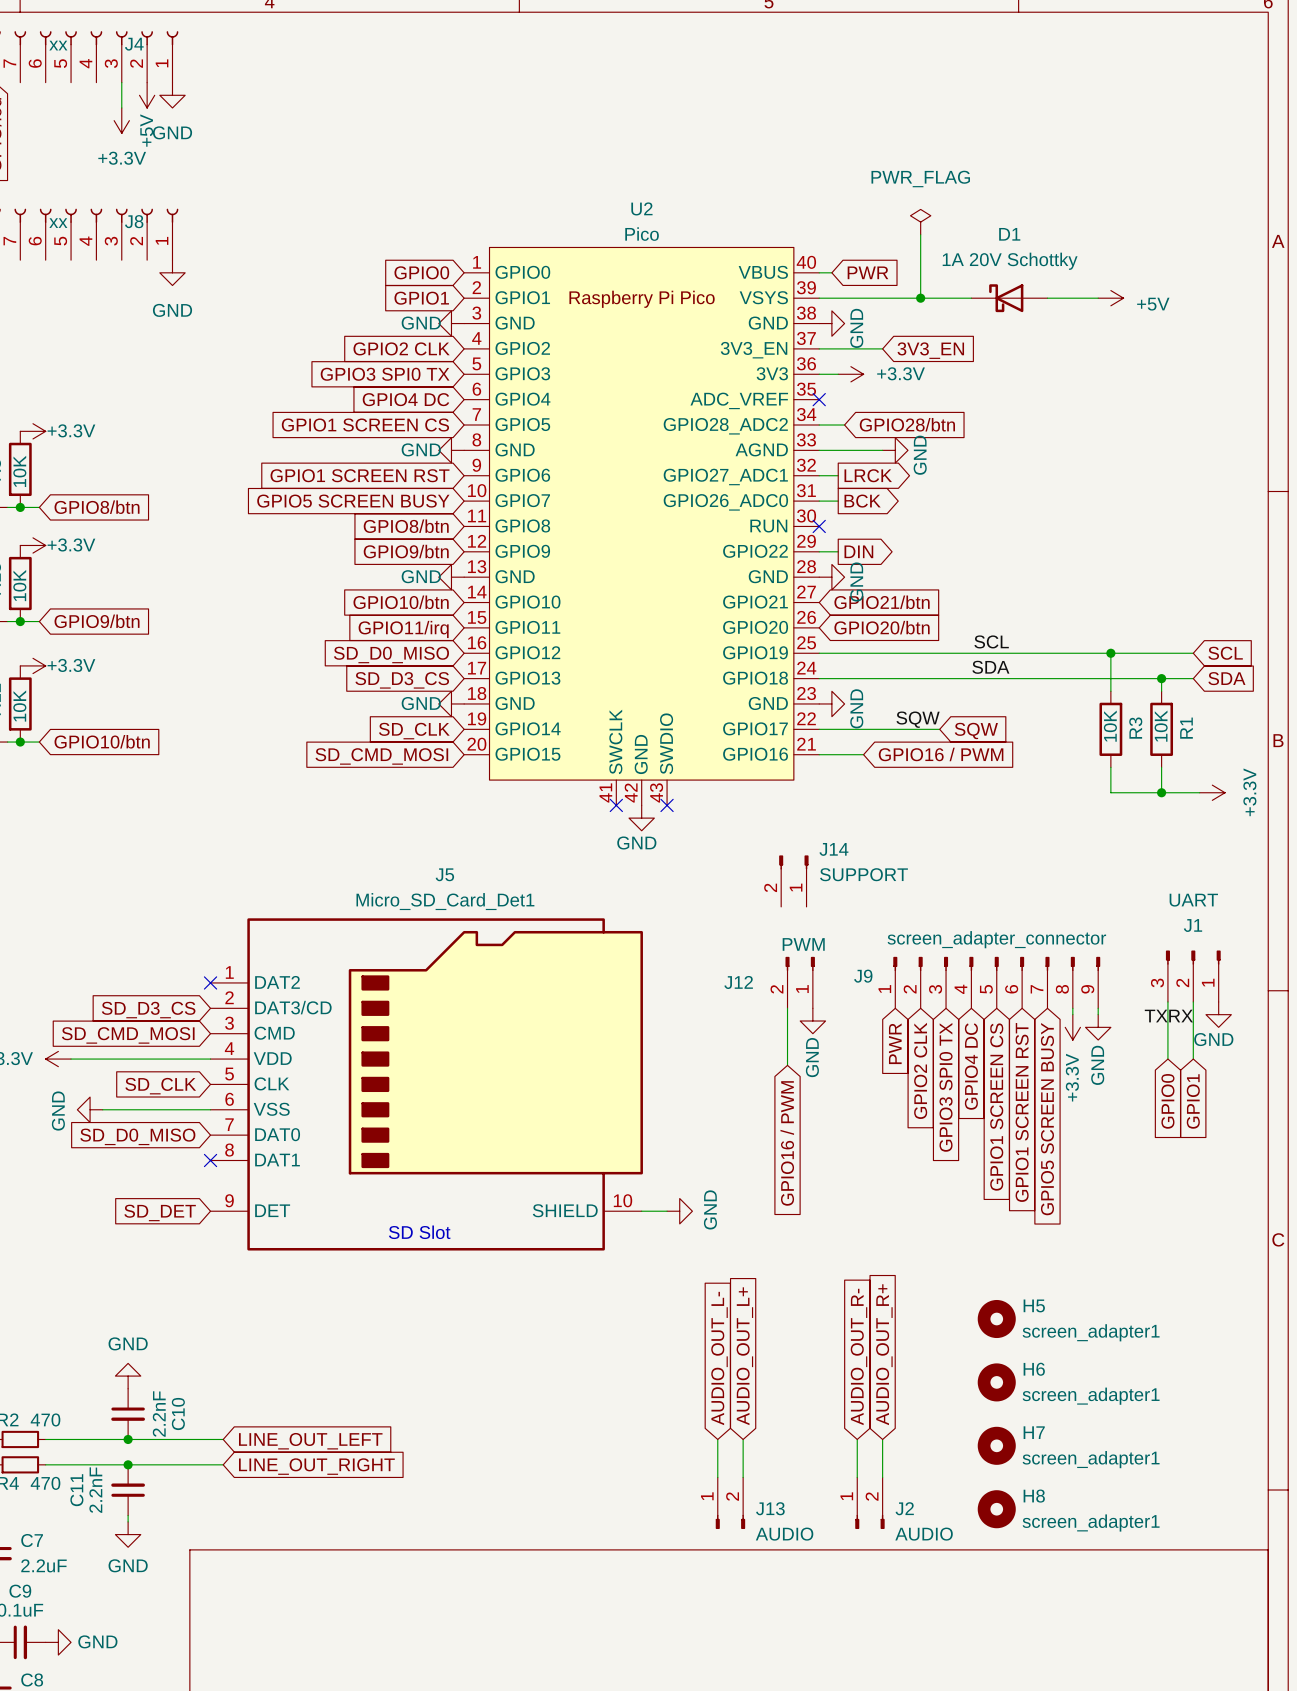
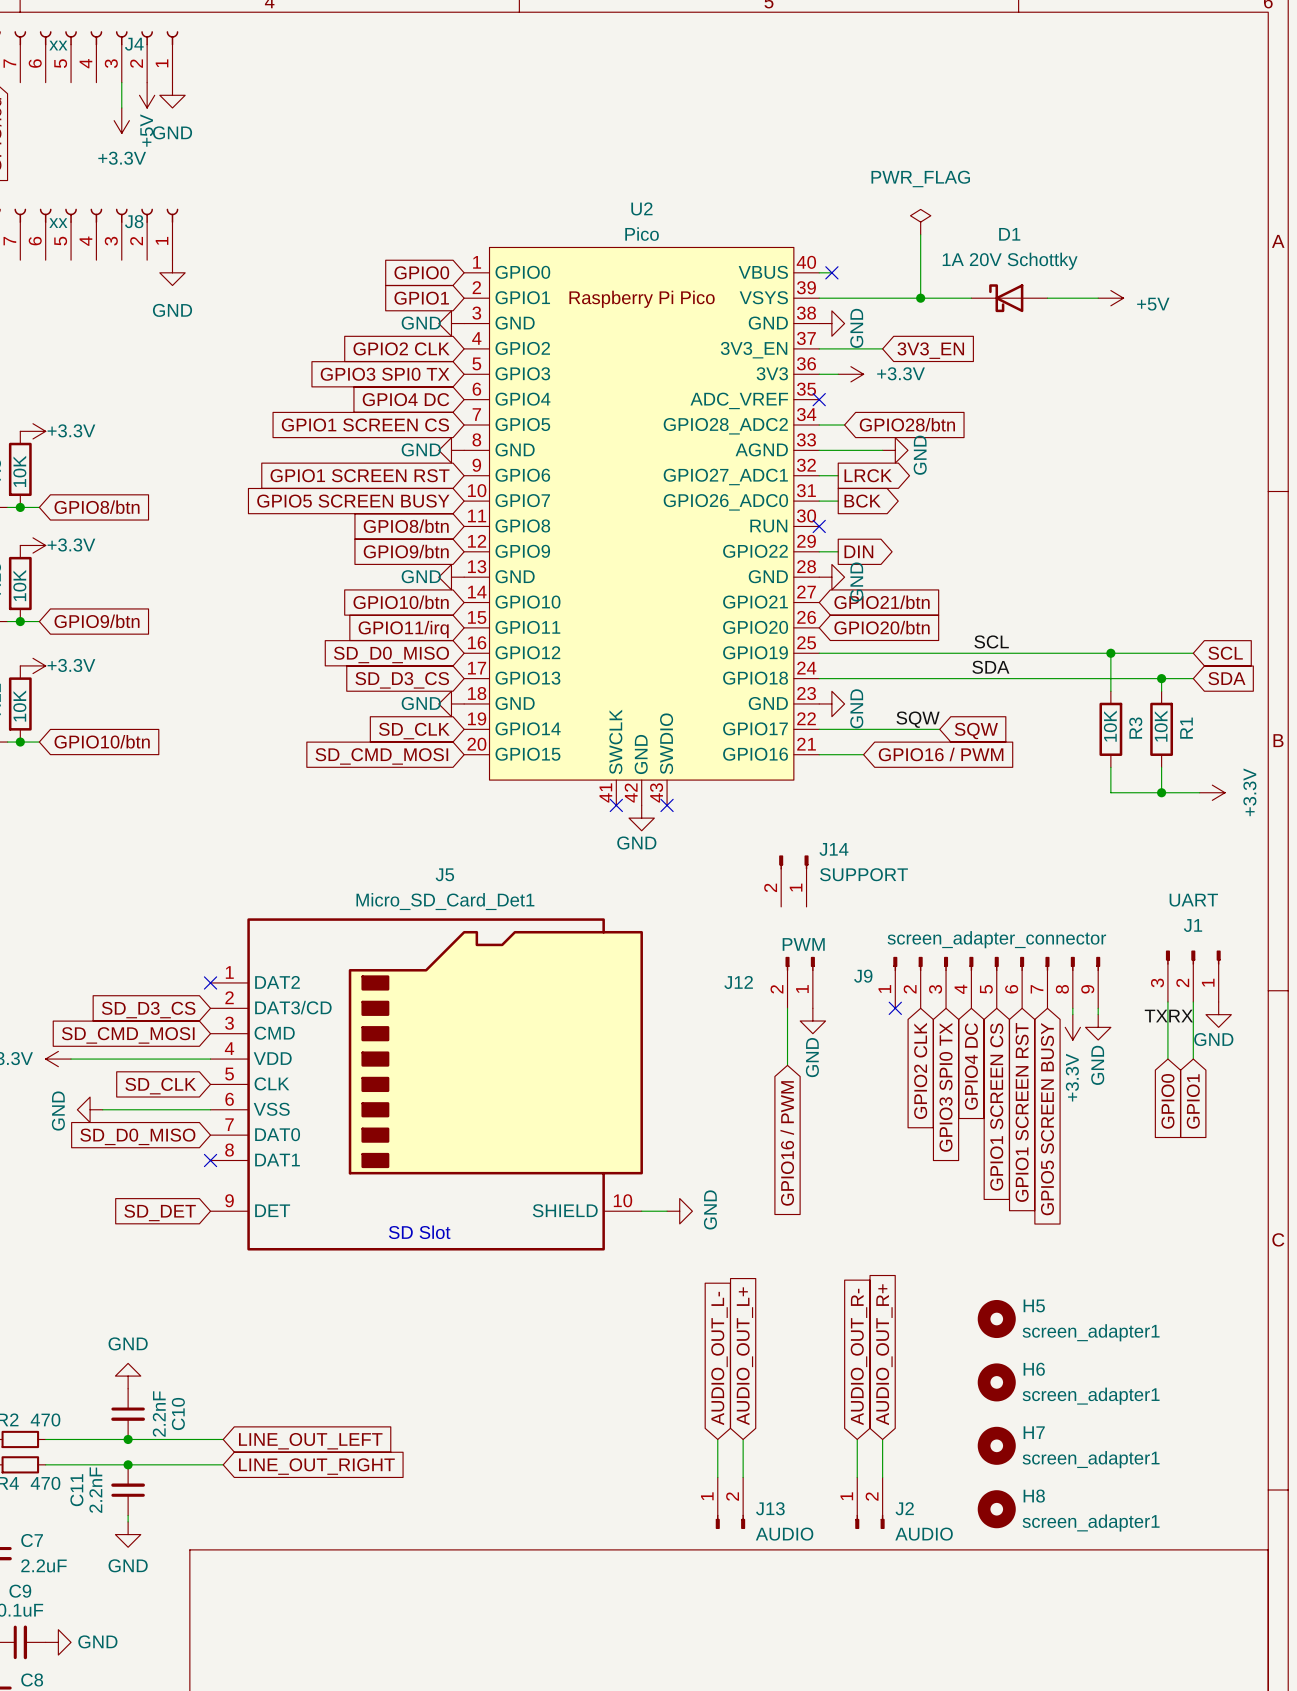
no-connect mark: none -> (831, 272)
global label: PWR (867, 272) -> none
no-connect mark: none -> (895, 1008)
global label: PWR (895, 1043) -> none

